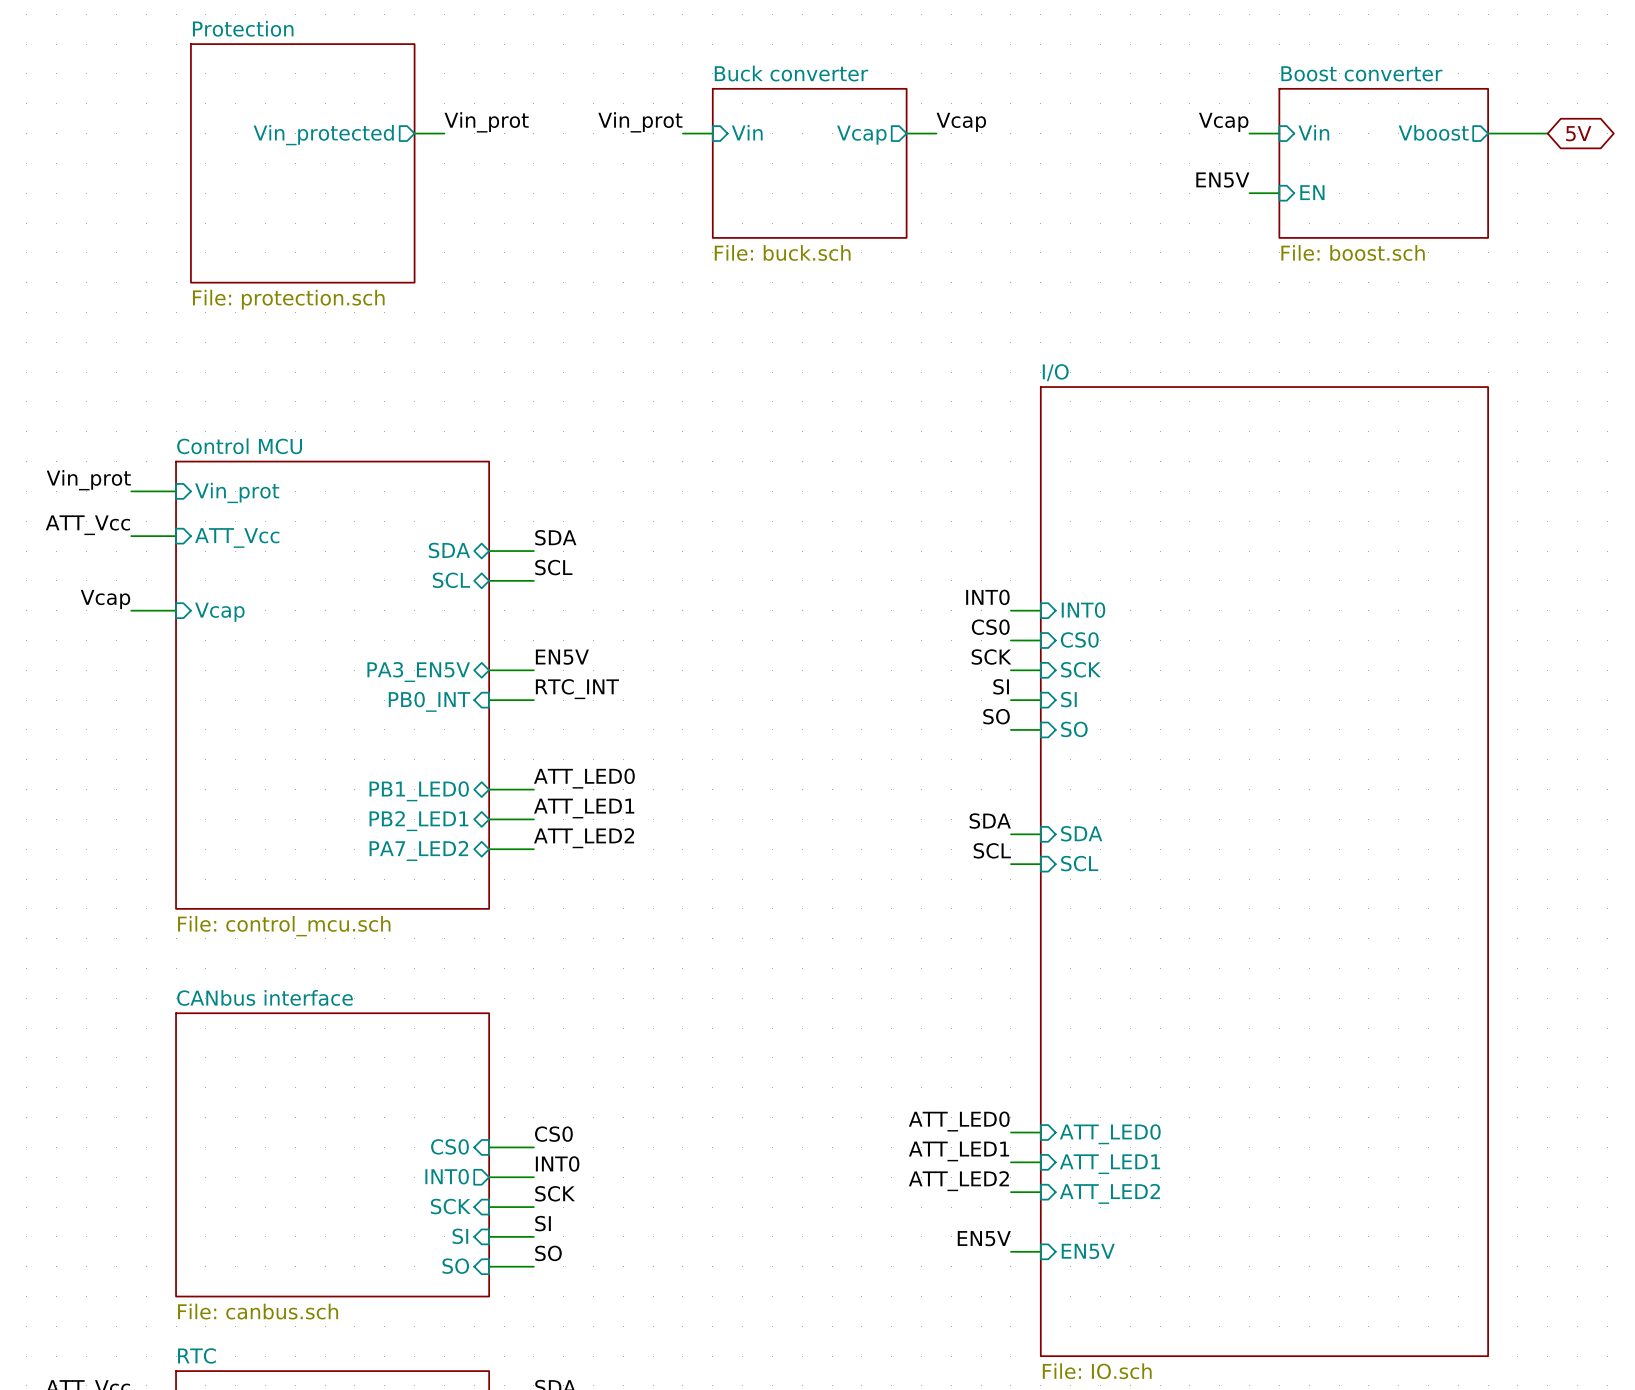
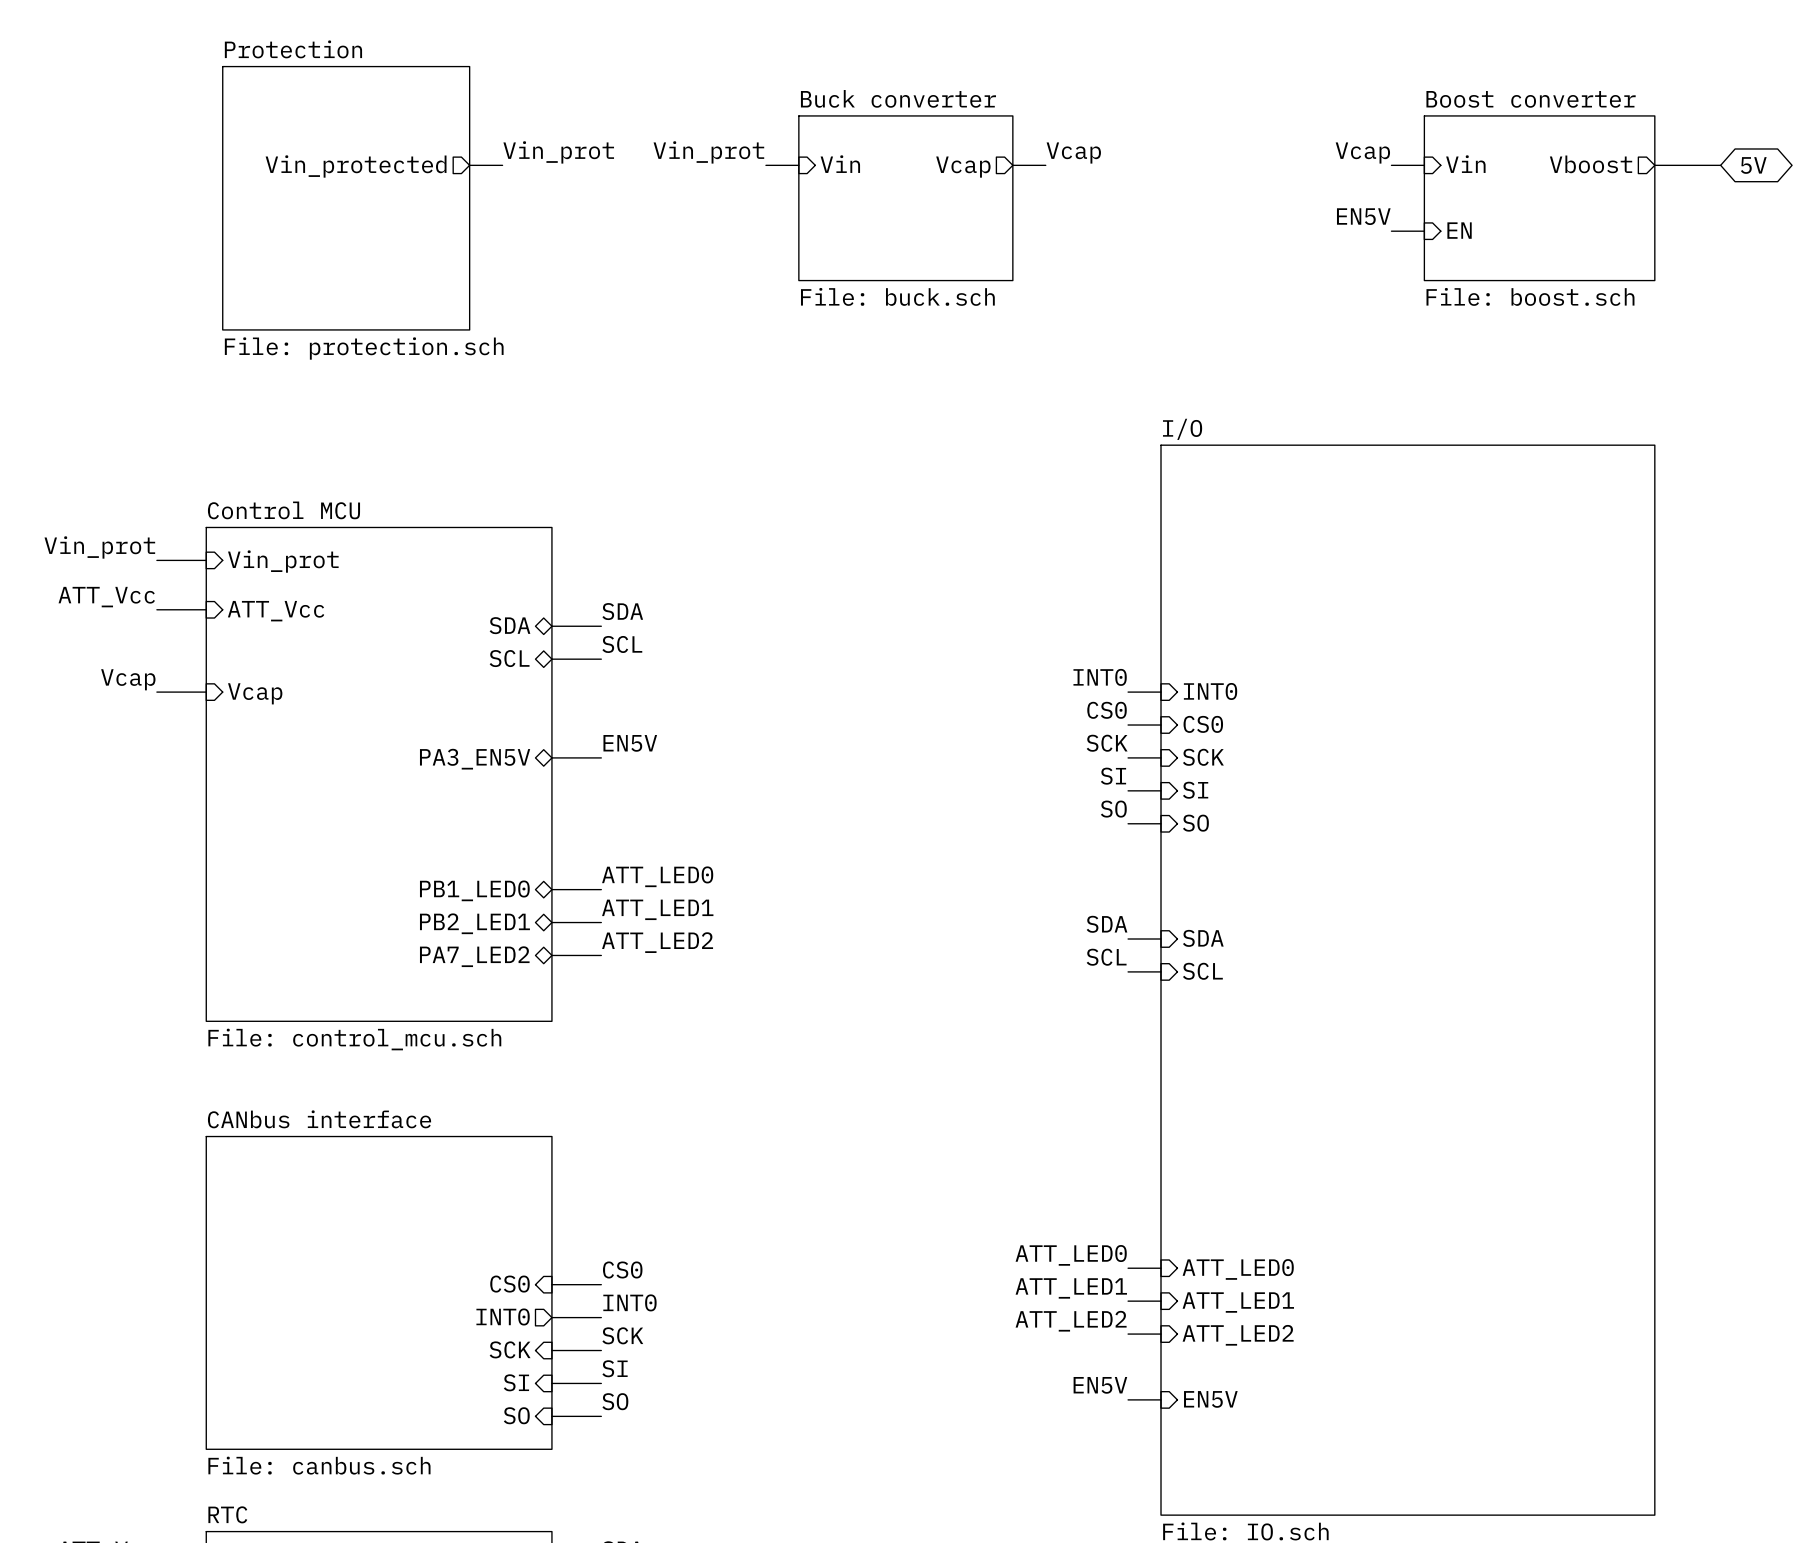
label: RTC_INT (577, 689) -> none
wire: (489, 700) (533, 700) -> none
sheet pin: PB0_INT (429, 701) -> none

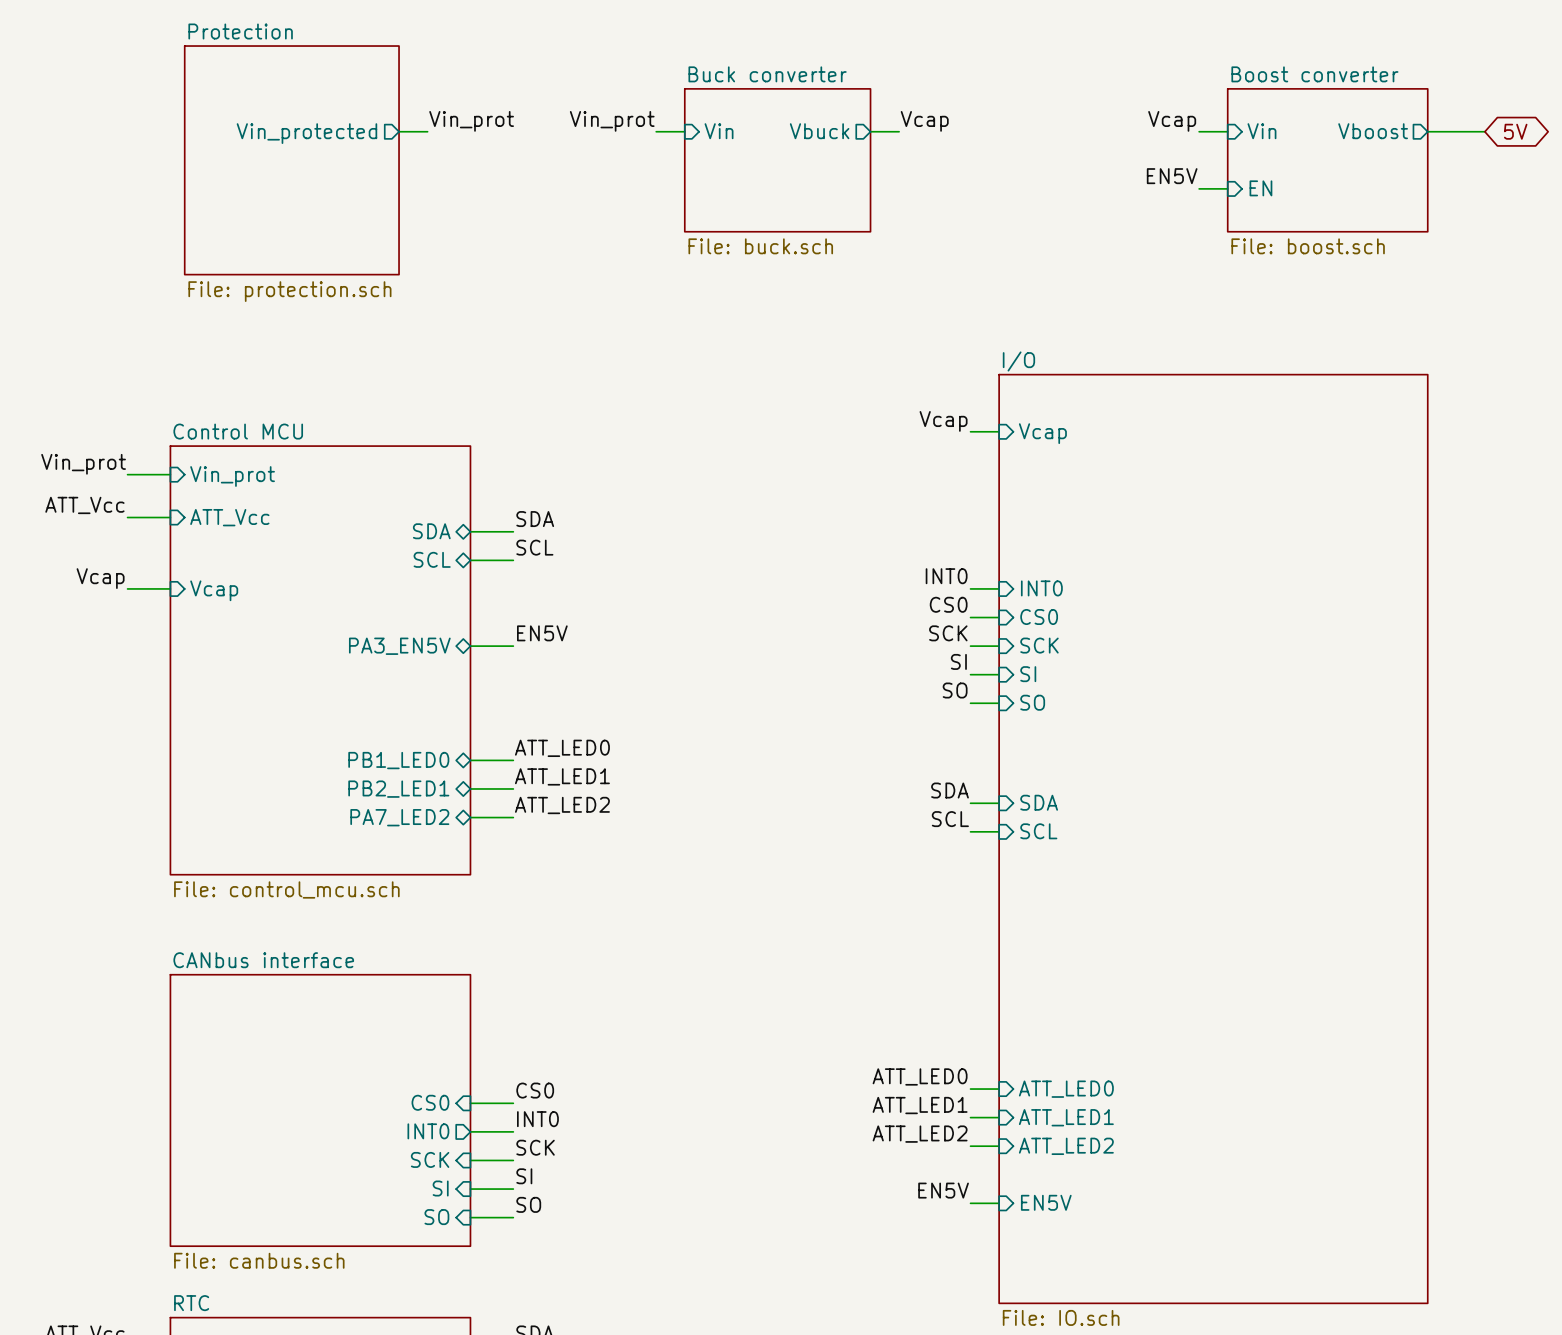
sheet pin: Vcap (963, 167) -> Vbuck (819, 131)
label: none -> Vcap (943, 421)
wire: none -> (970, 431) (999, 431)
sheet pin: none -> Vcap (1042, 433)

